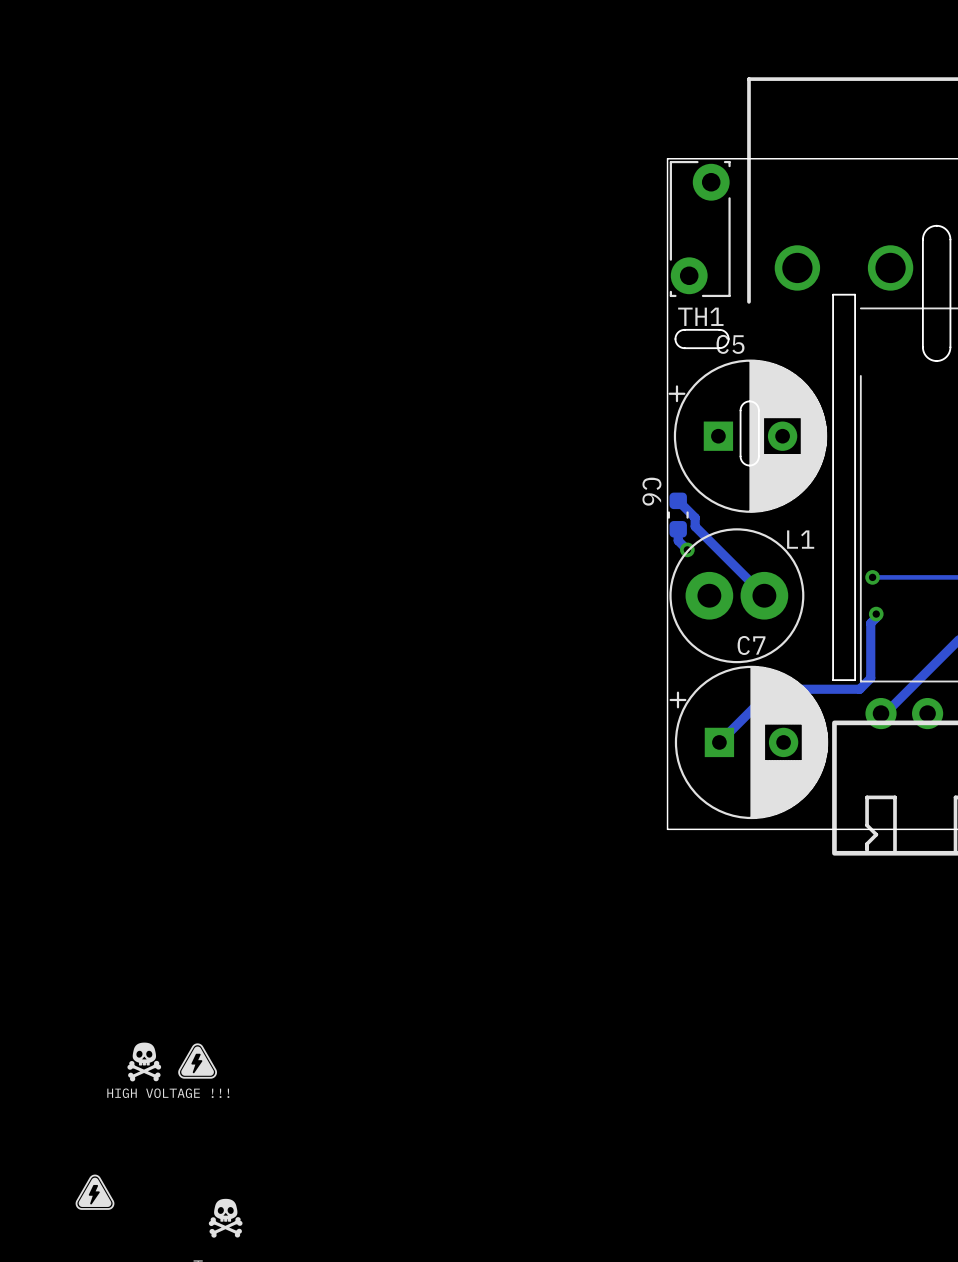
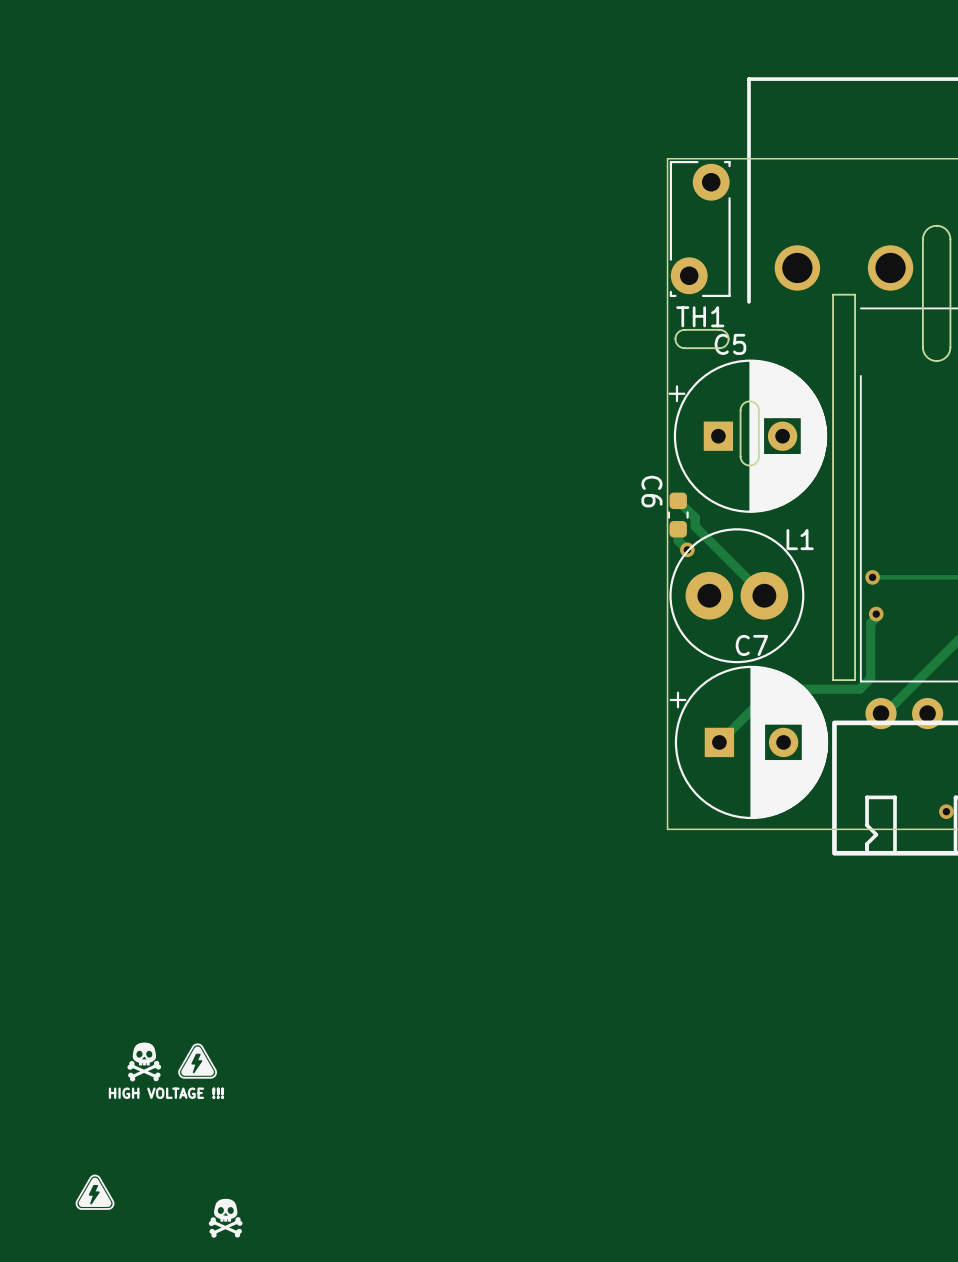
via: none -> (946, 811)

